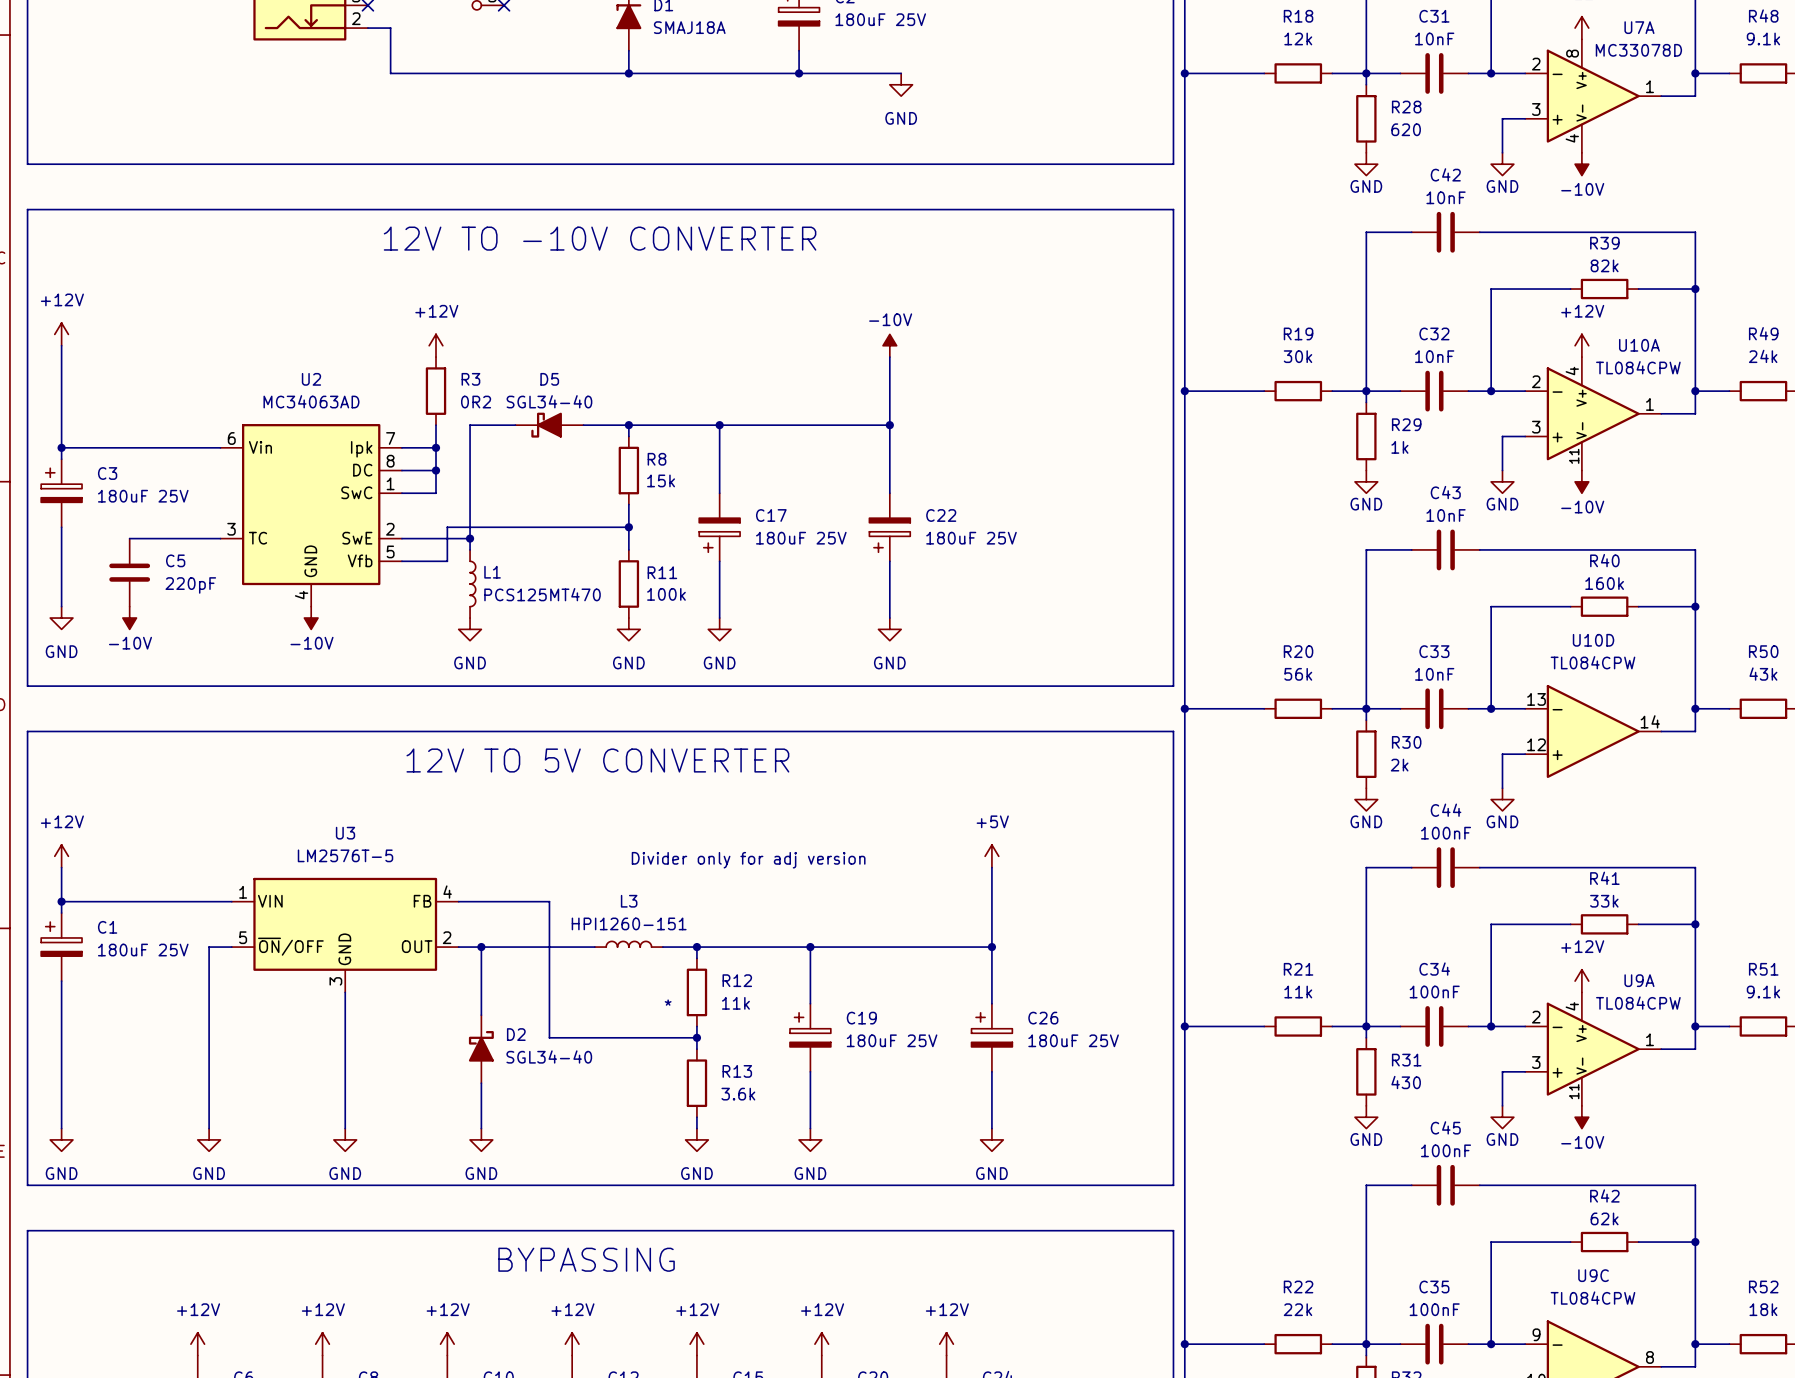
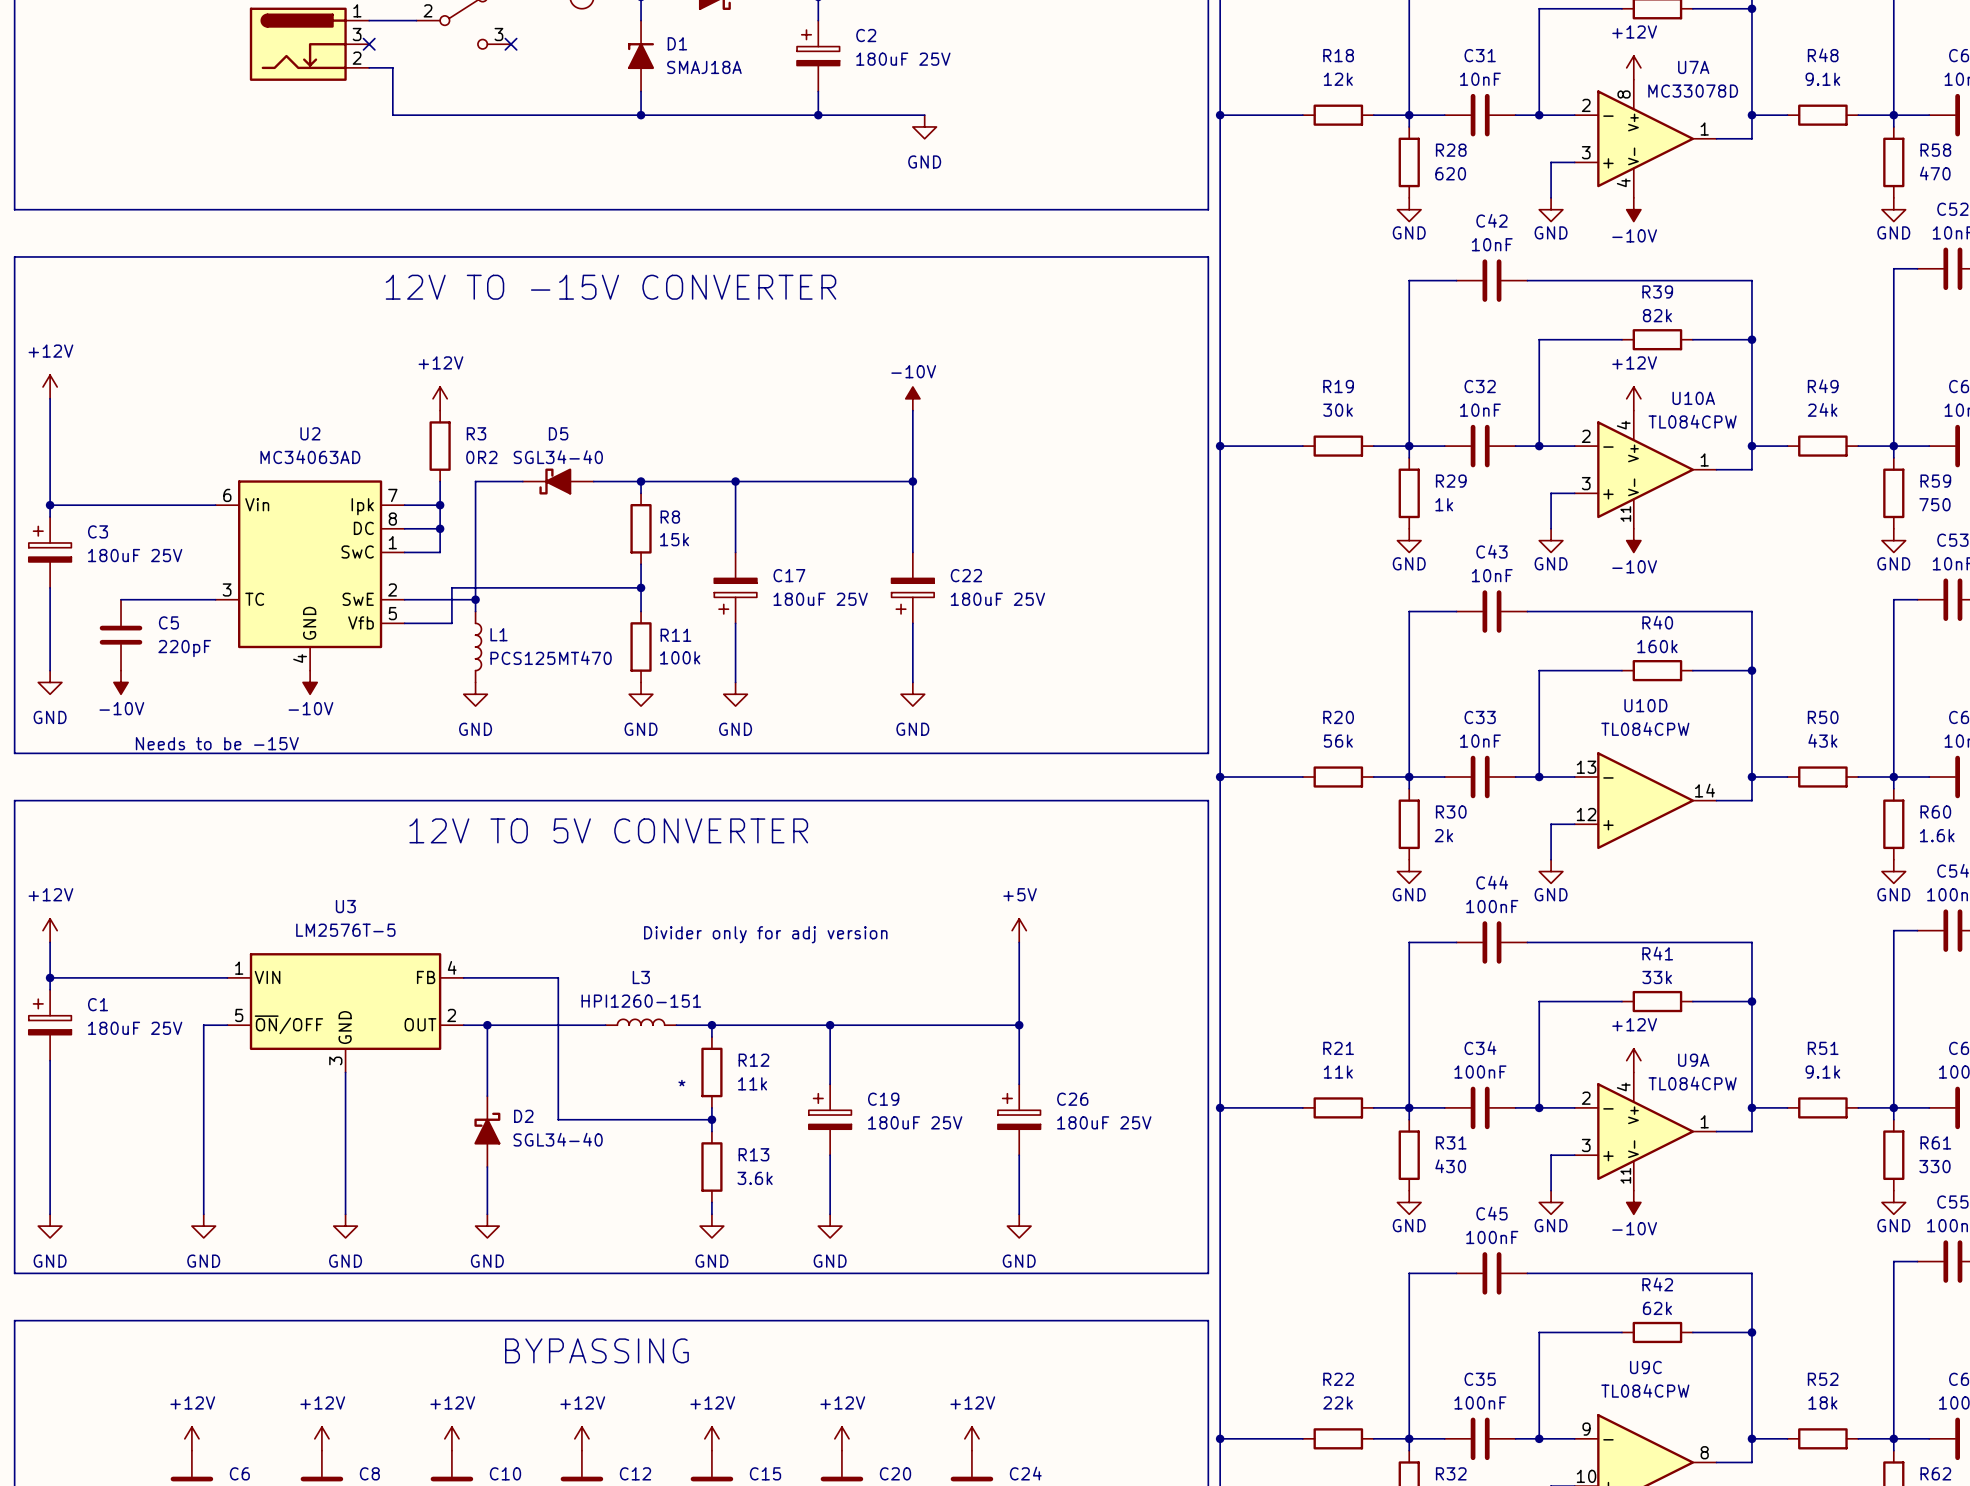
text: 12V TO -10V CONVERTER (600, 238) -> 12V TO -15V CONVERTER (611, 287)
text: none -> Needs to be -15V (217, 743)

